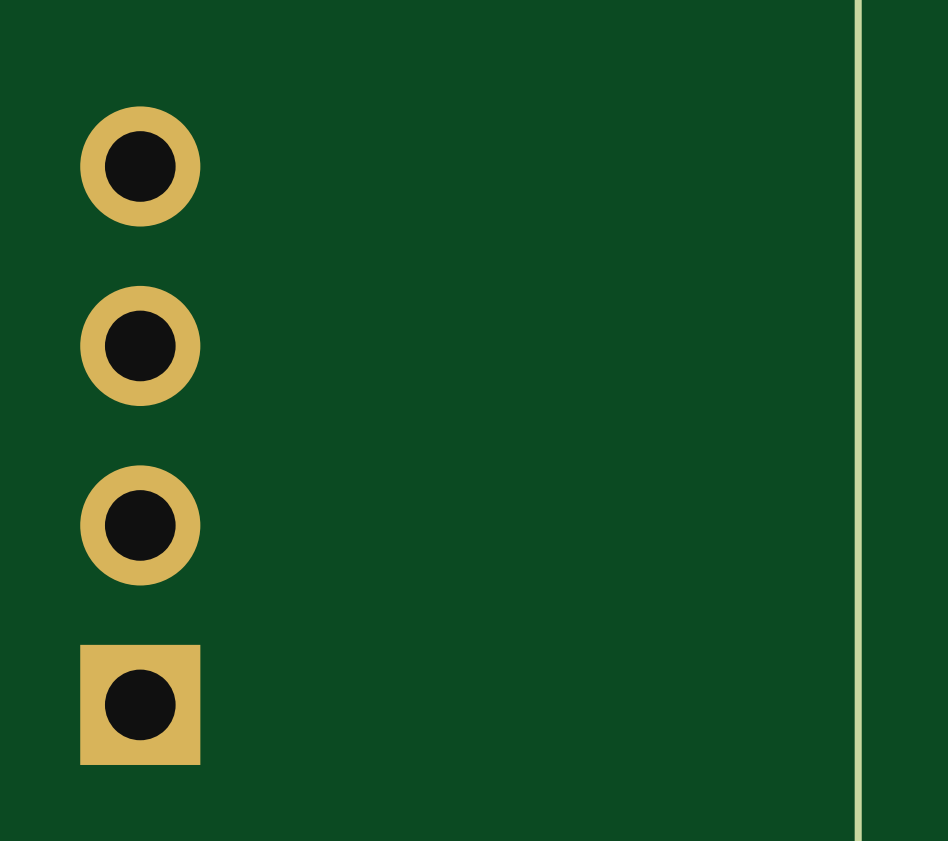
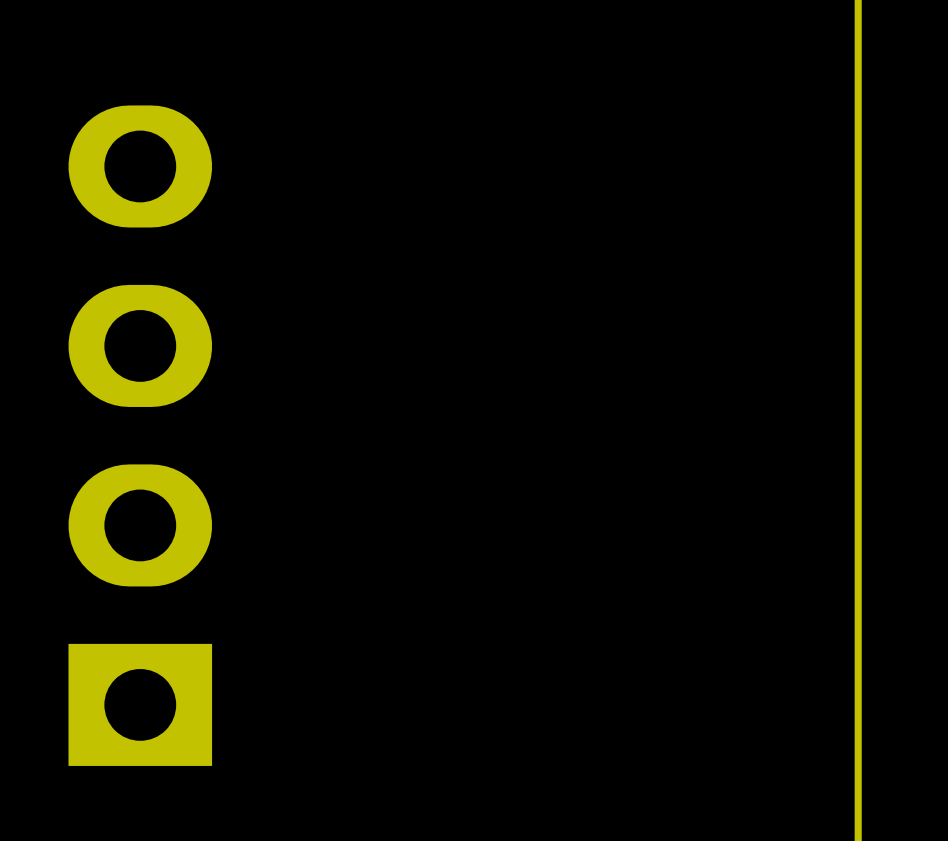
part footprint: [80, 106, 201, 765] -> [68, 105, 213, 766]

